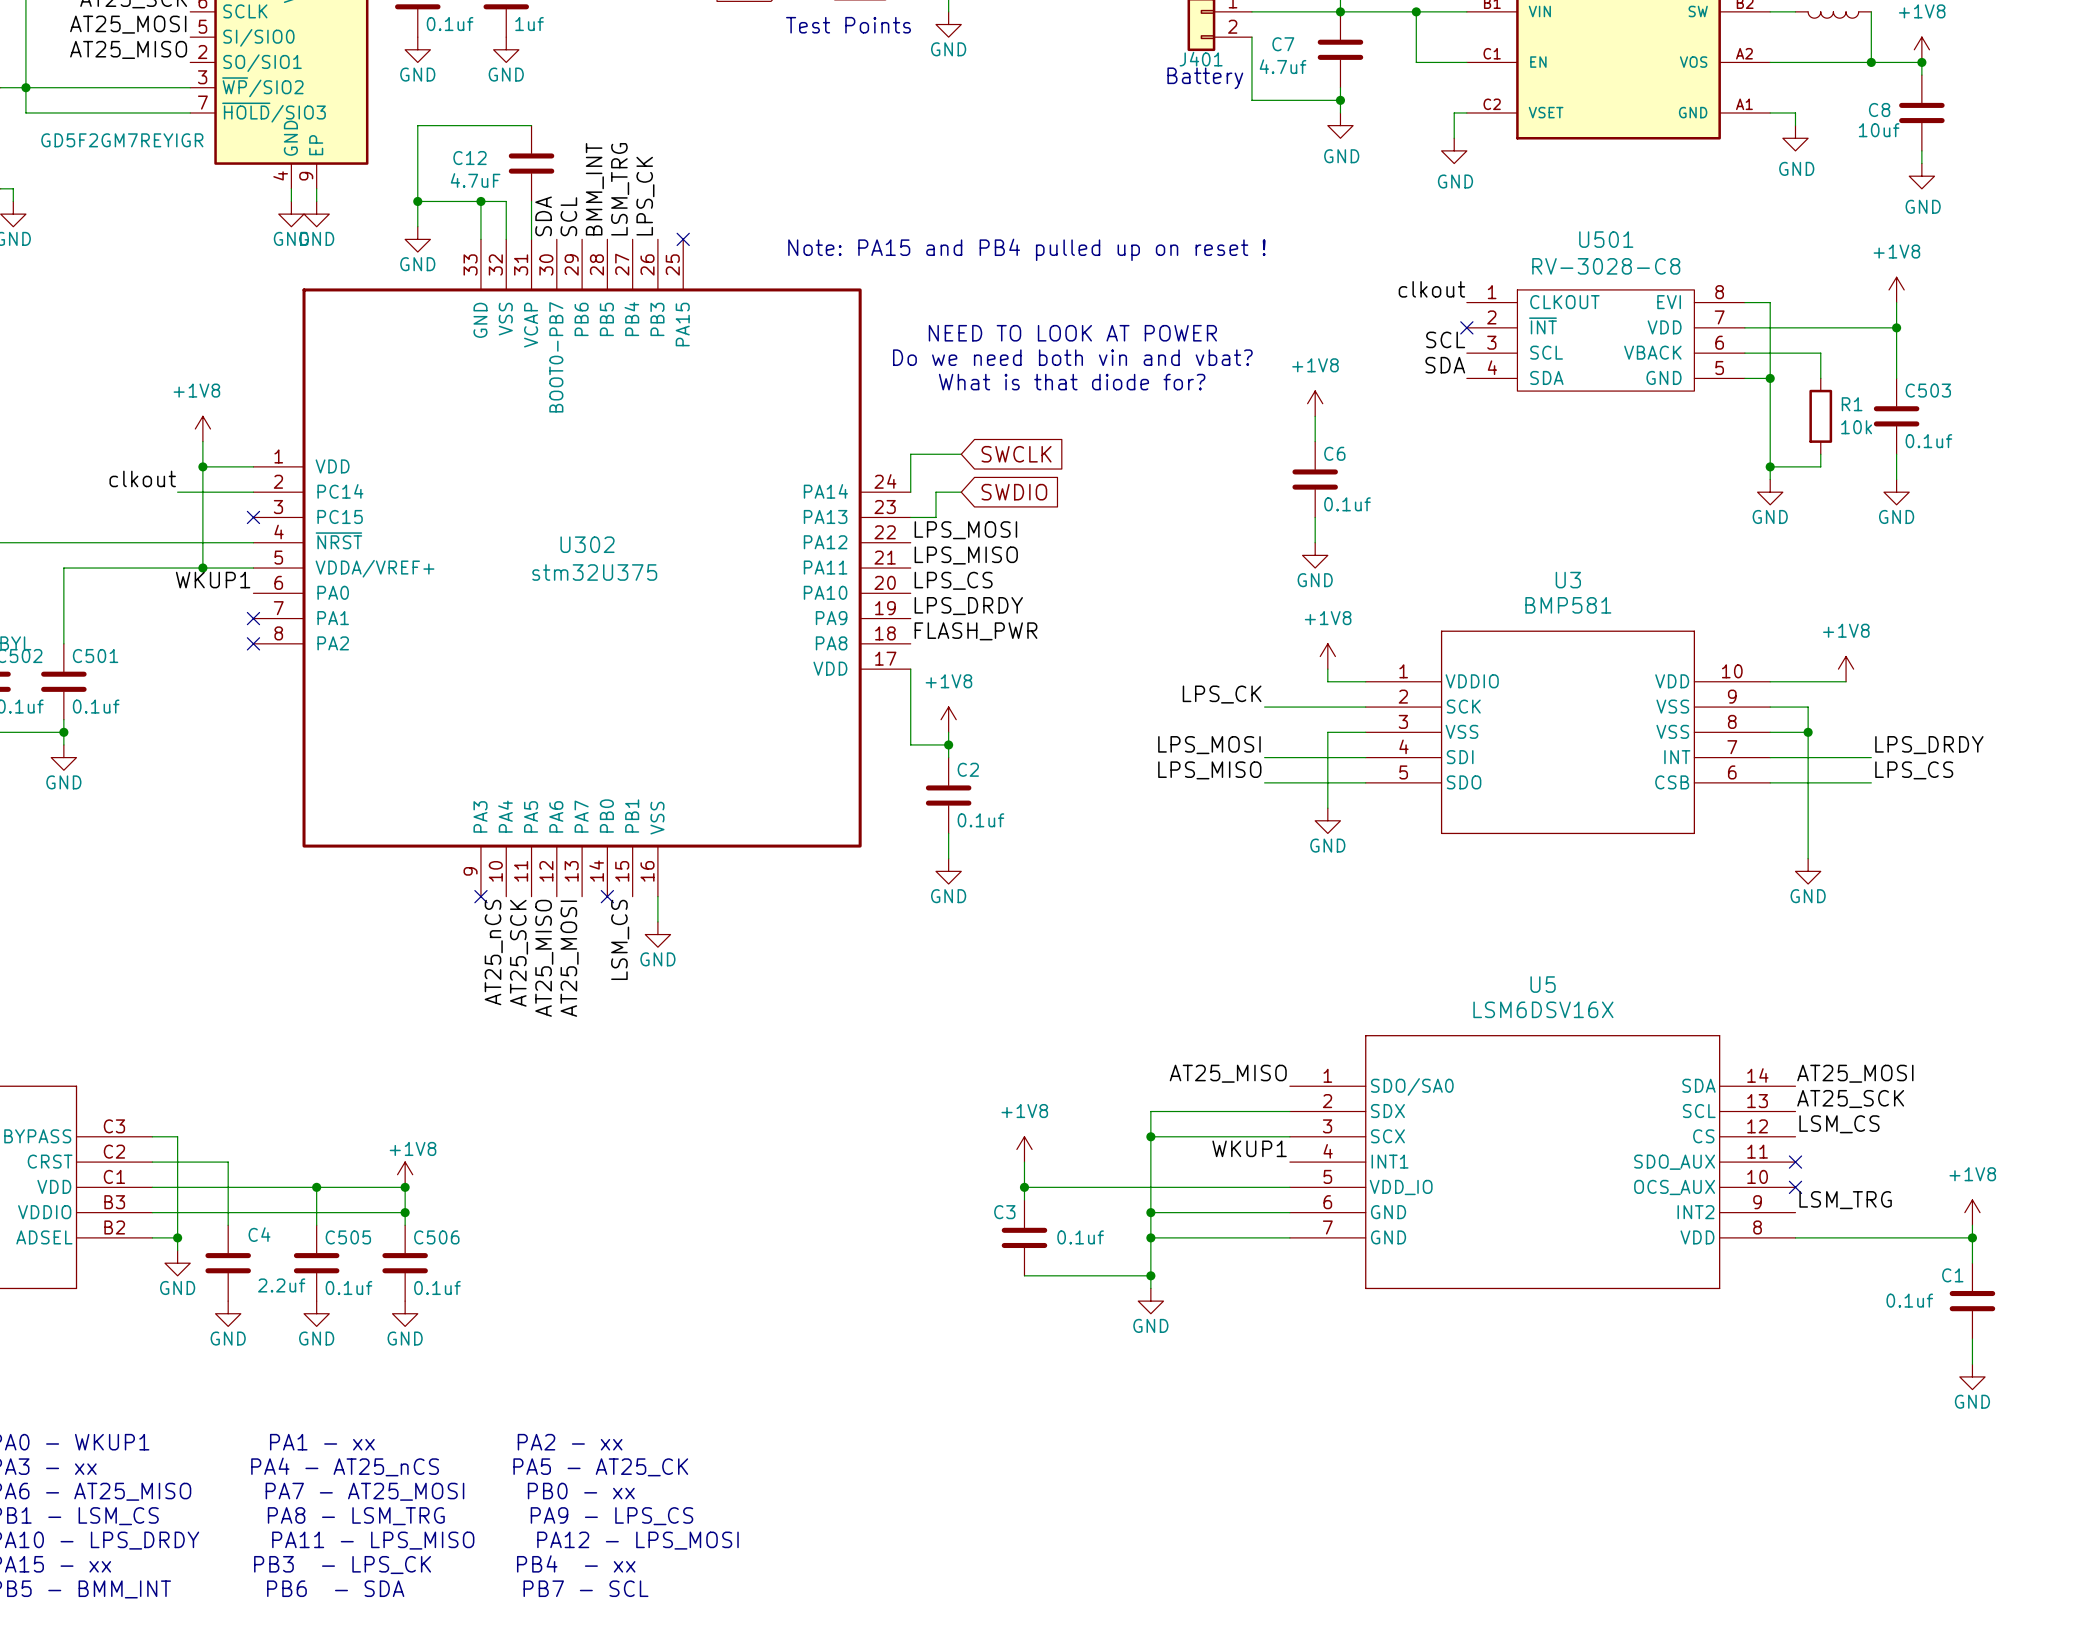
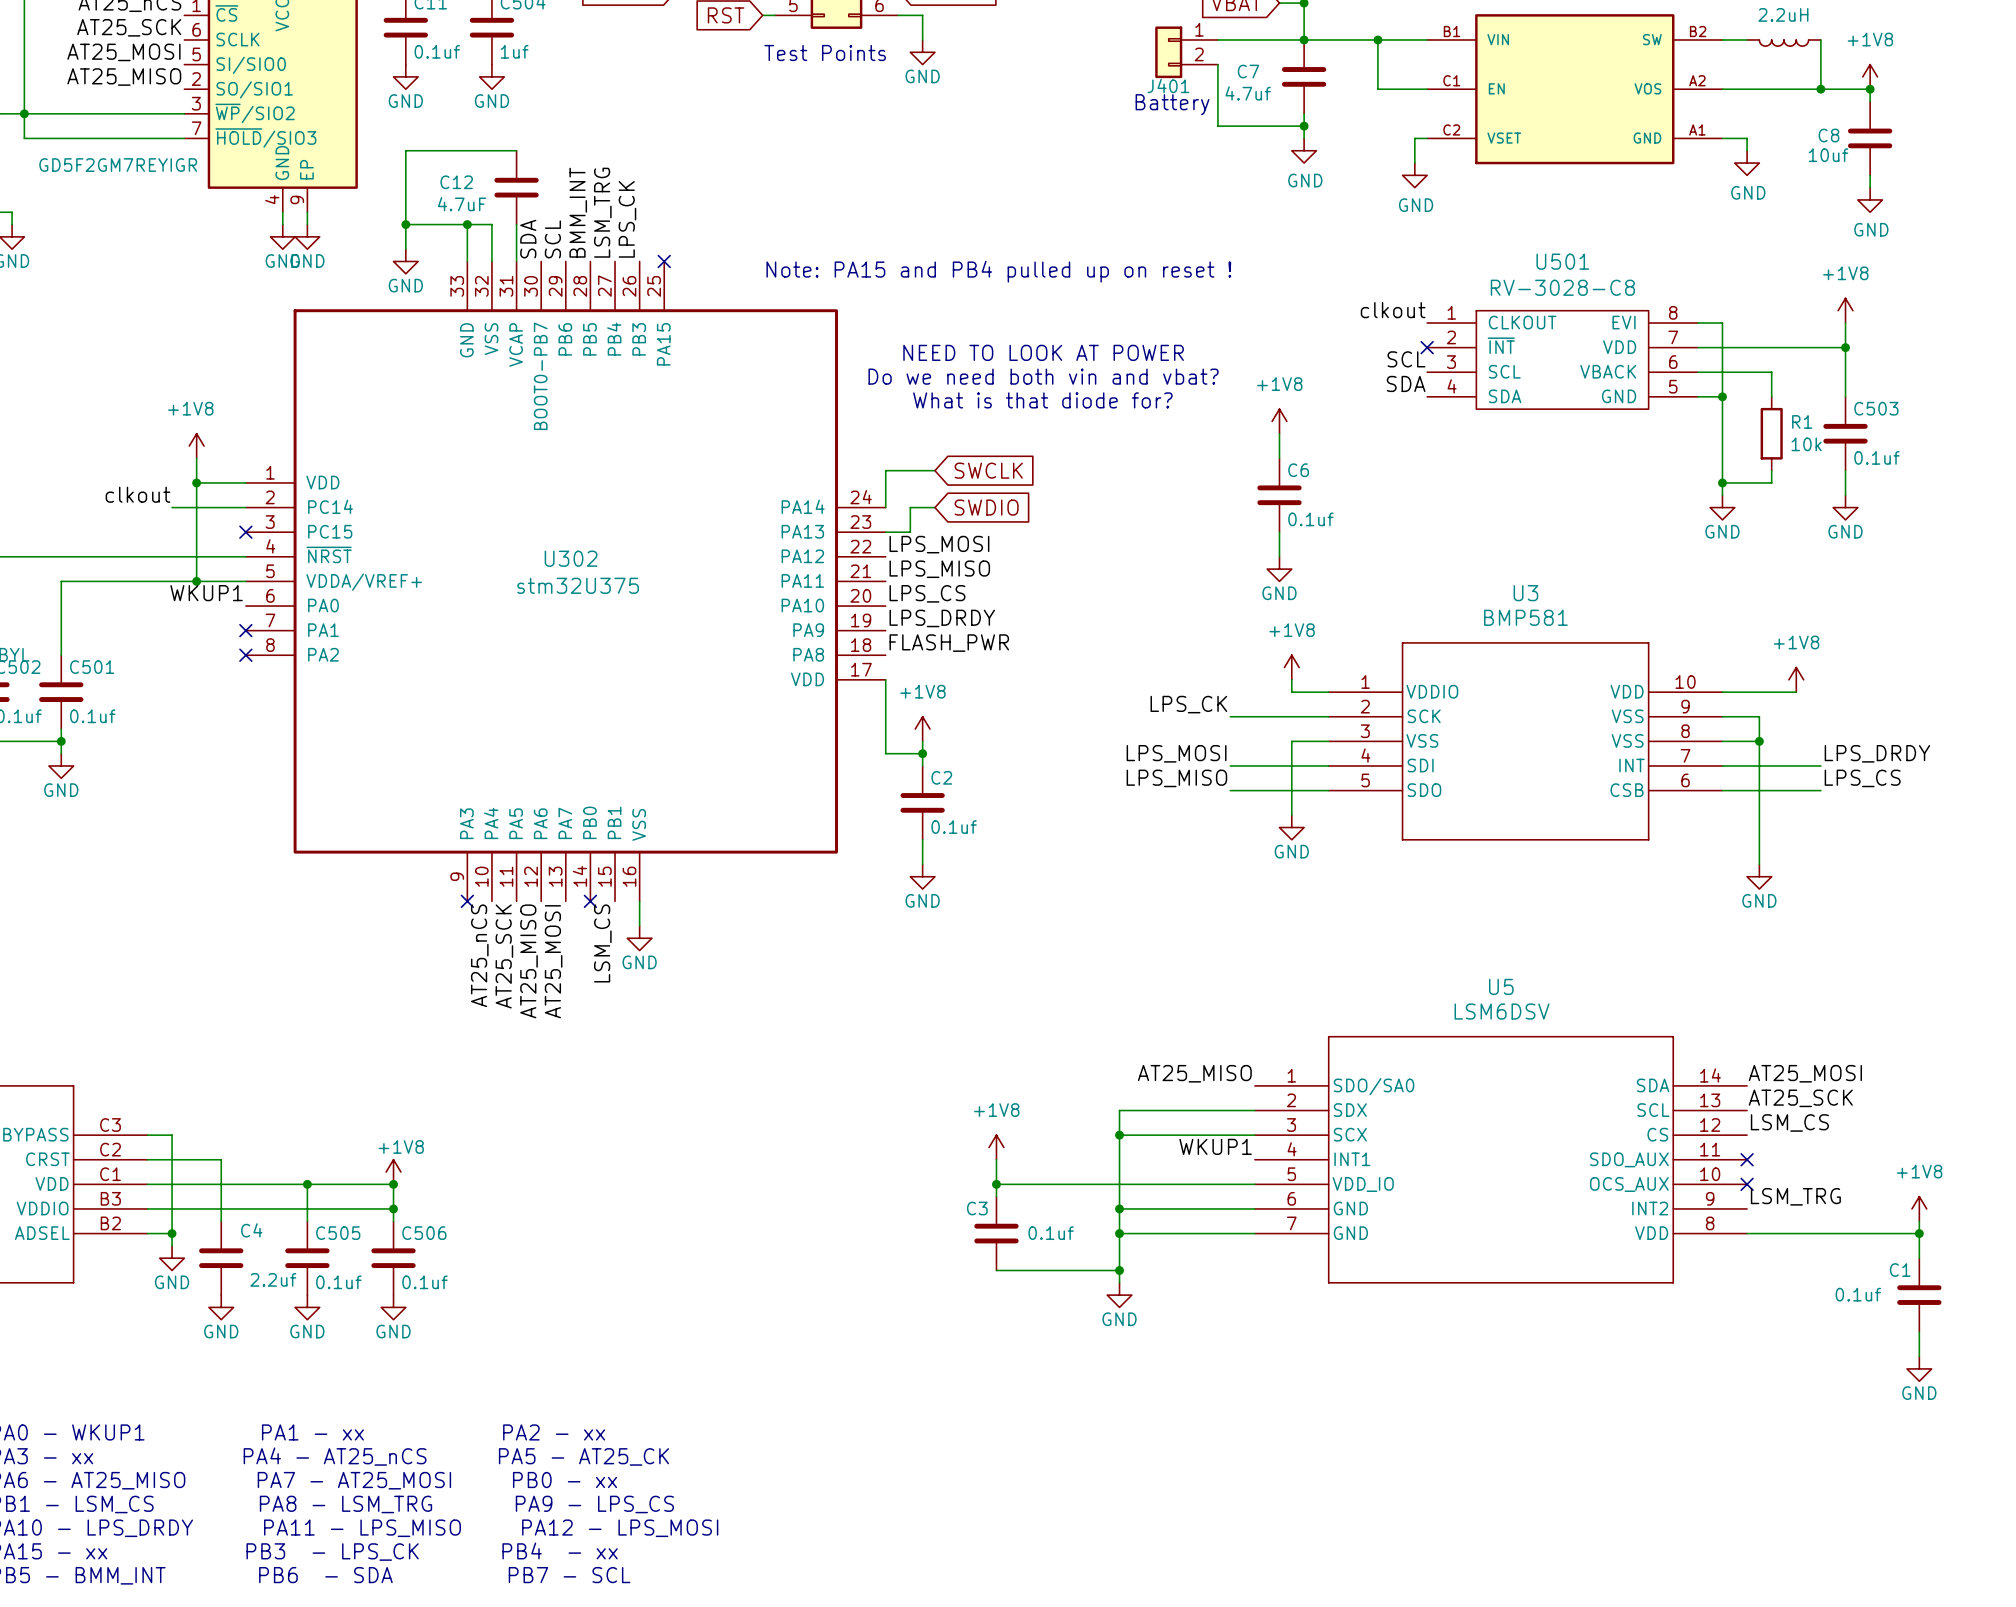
U5 value: LSM6DSV16X (1543, 1009) -> LSM6DSV (1502, 1011)

